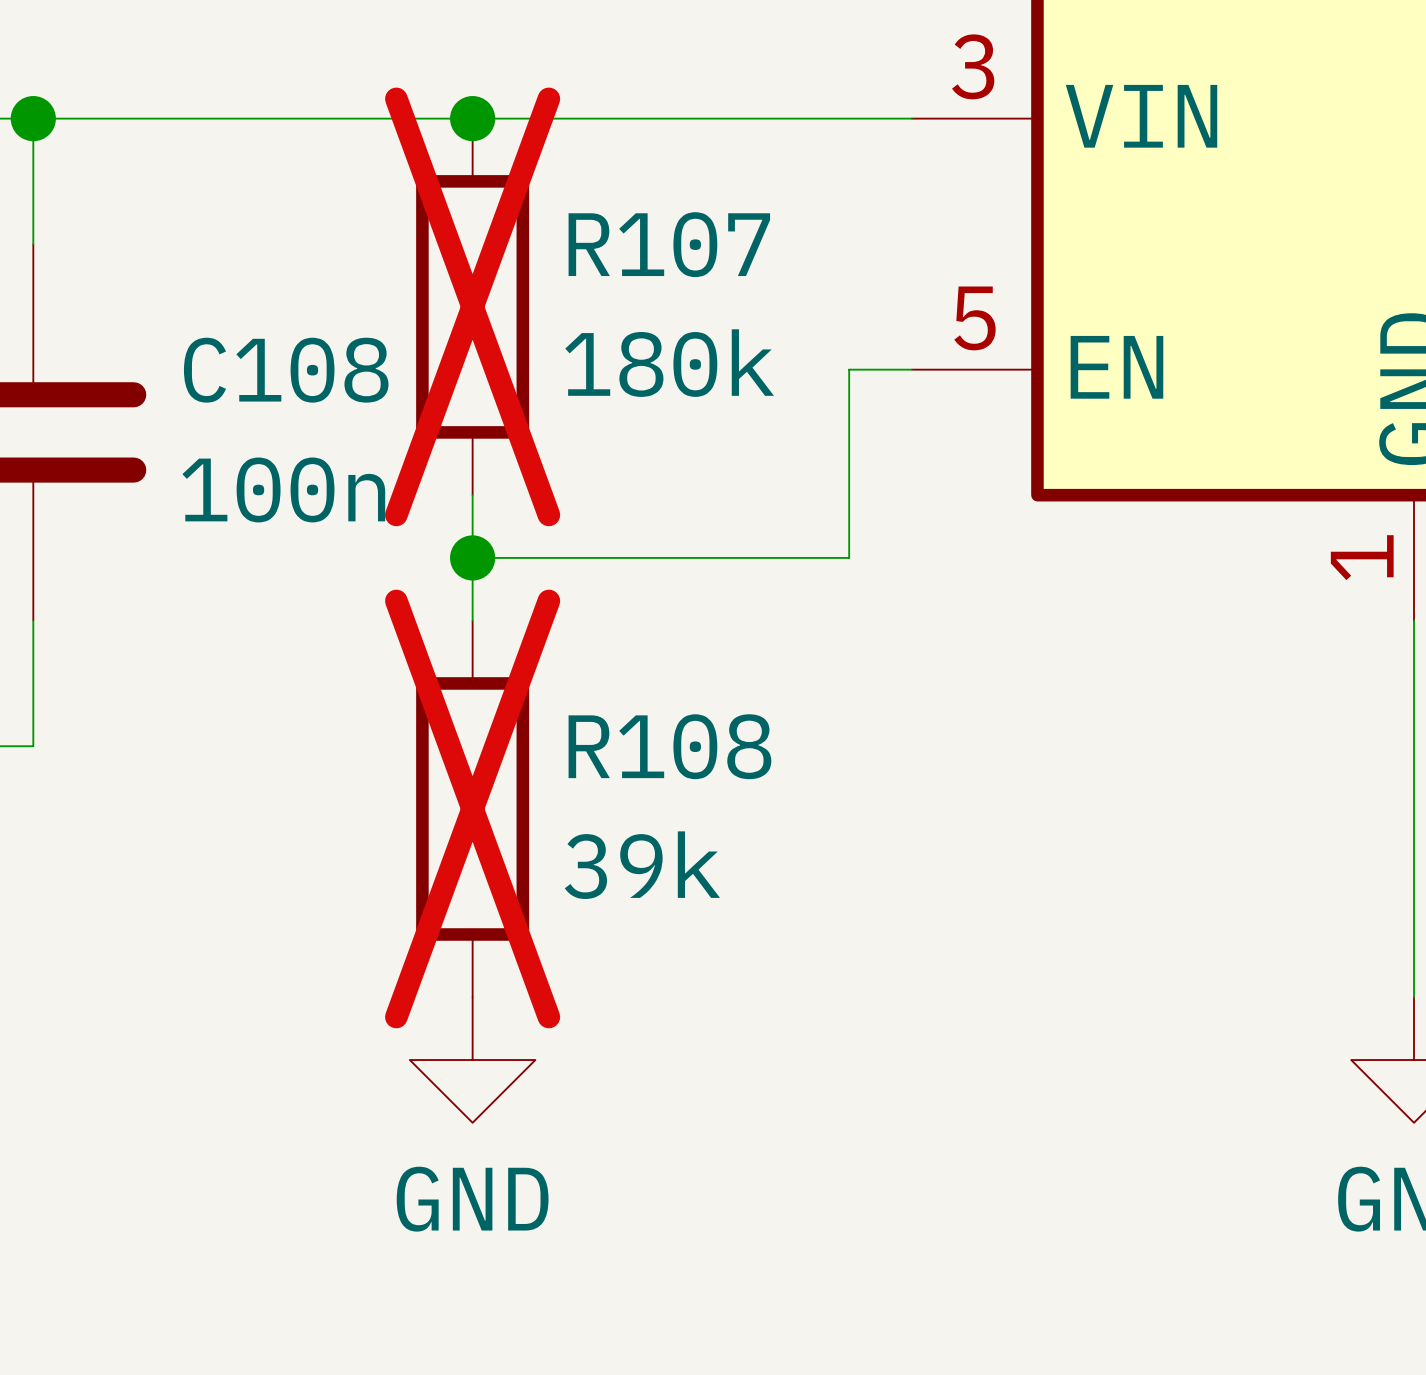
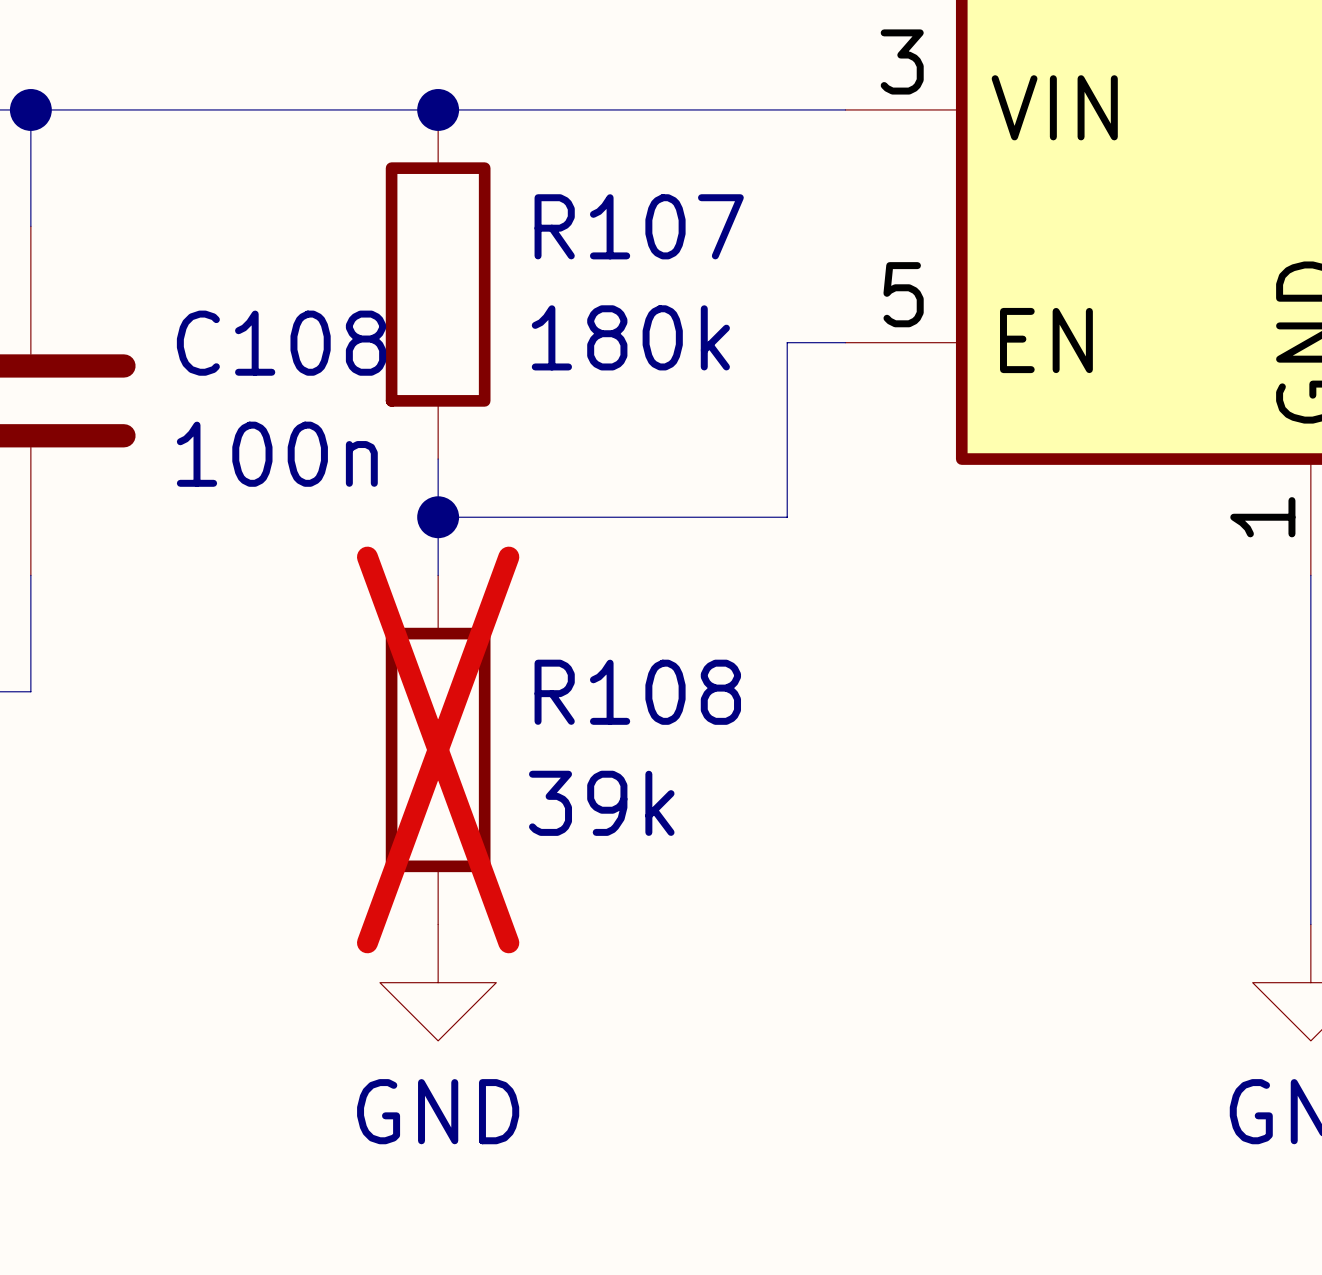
R107 do-not-place cross: (472, 306) -> none

